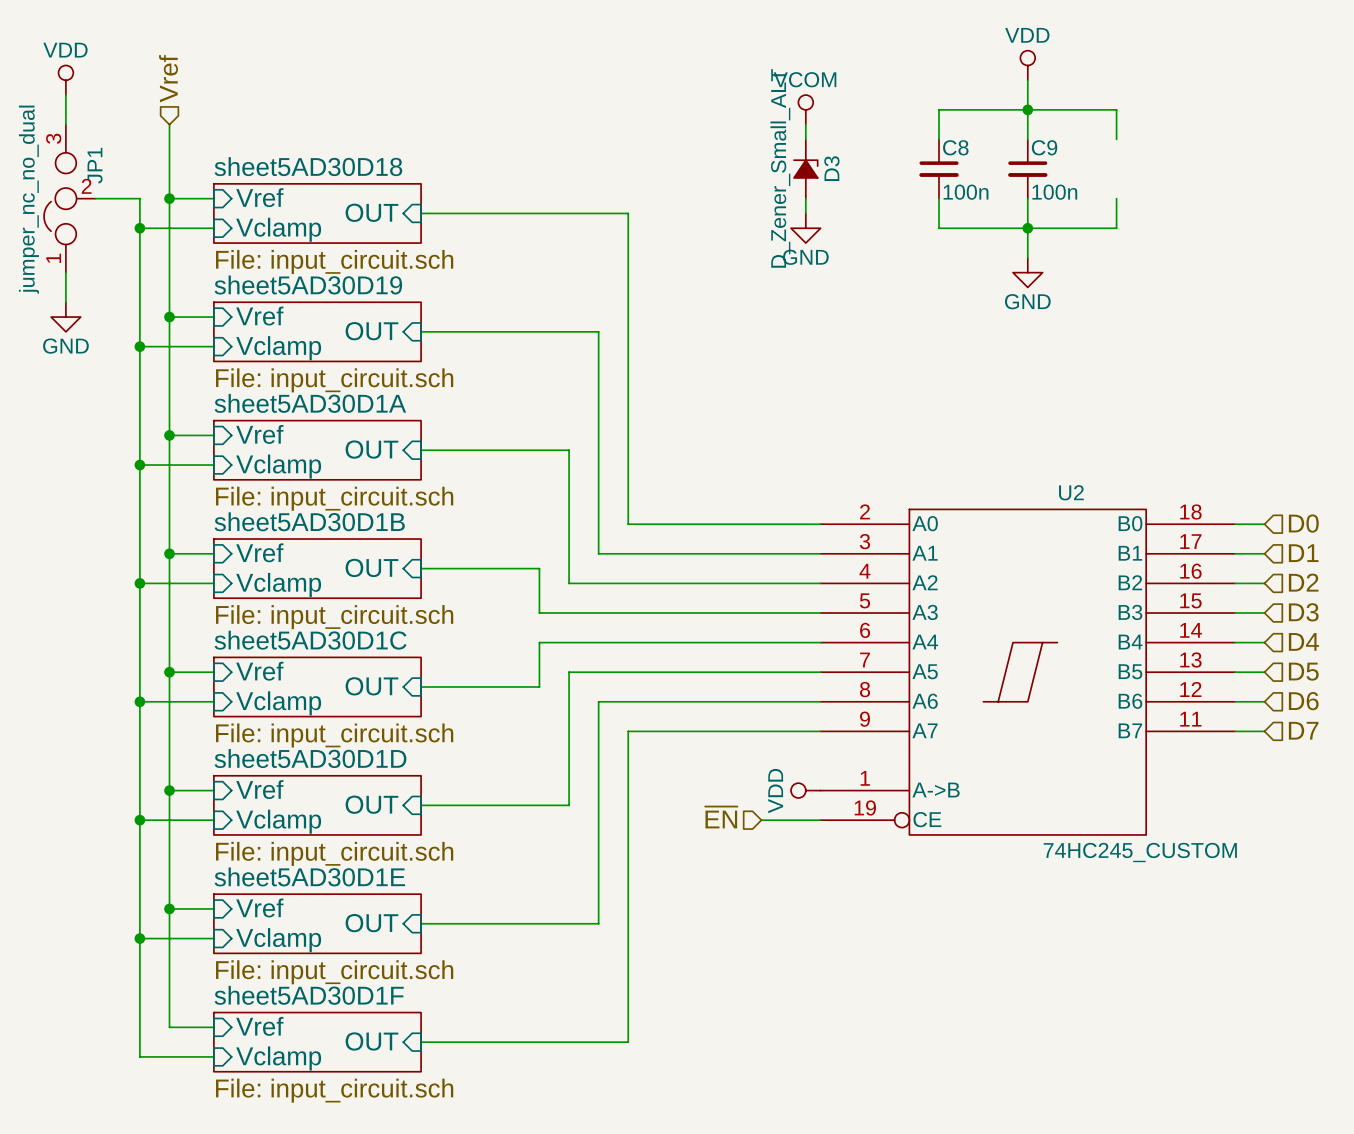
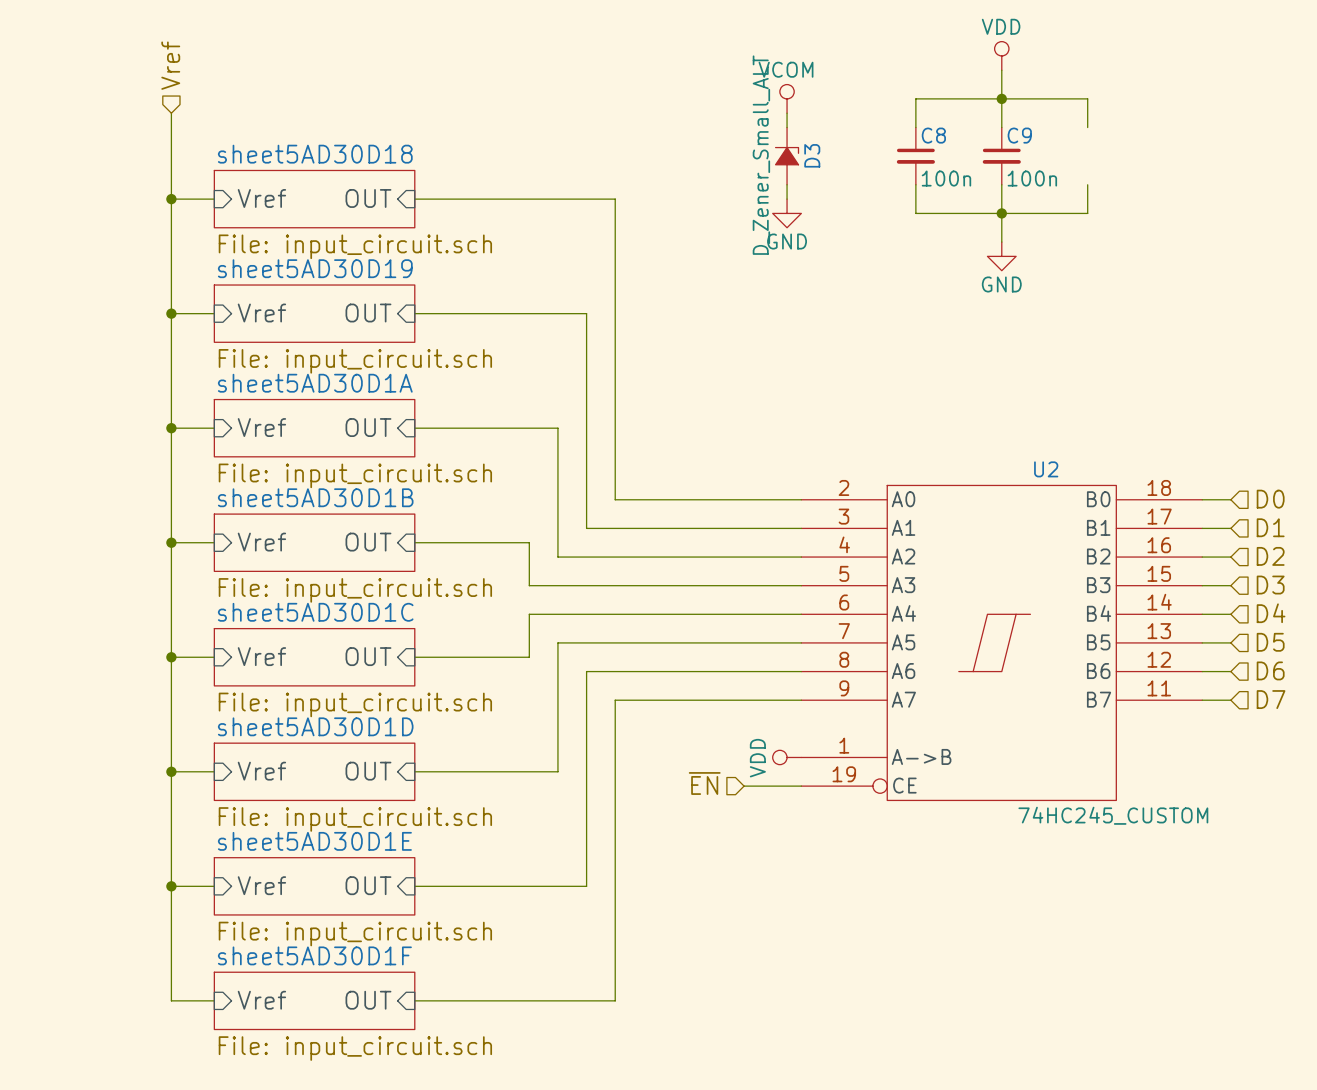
power symbol: VDD (65, 80) -> none
wire: (65, 95) (65, 124) -> none
sheet pin position: Vref (259, 197) -> Vref (261, 198)
JP1: jumper_nc_no_dual (69, 198) -> none
wire: (95, 198) (139, 198) (139, 1056) (213, 1056) -> none
wire: (169, 198) (213, 198) -> (171, 199) (214, 199)
junction position: (169, 198) -> (171, 199)
wire: (139, 228) (213, 228) -> none
junction: (139, 228) -> none
sheet pin: Vclamp (278, 229) -> none
wire: (65, 272) (65, 302) -> none
sheet pin position: Vref (259, 316) -> Vref (261, 313)
power symbol: GND (65, 317) -> none
wire: (169, 317) (213, 317) -> (171, 313) (214, 313)
junction position: (169, 317) -> (171, 313)
wire: (139, 346) (213, 346) -> none
junction: (139, 346) -> none
sheet pin: Vclamp (278, 348) -> none
sheet pin position: Vref (259, 434) -> Vref (261, 427)
wire: (169, 435) (213, 435) -> (171, 428) (214, 428)
junction position: (169, 435) -> (171, 428)
wire: (139, 465) (213, 465) -> none
junction: (139, 465) -> none
sheet pin: Vclamp (278, 466) -> none
sheet pin position: Vref (259, 552) -> Vref (261, 542)
wire: (169, 553) (213, 553) -> (171, 542) (214, 542)
junction position: (169, 553) -> (171, 542)
wire: (139, 583) (213, 583) -> none
junction: (139, 583) -> none
sheet pin: Vclamp (278, 584) -> none
sheet pin position: Vref (259, 671) -> Vref (261, 656)
wire: (169, 672) (213, 672) -> (171, 657) (214, 657)
junction position: (169, 672) -> (171, 657)
wire: (139, 701) (213, 701) -> none
junction: (139, 701) -> none
sheet pin: Vclamp (278, 703) -> none
sheet pin position: Vref (259, 789) -> Vref (261, 771)
wire: (169, 790) (213, 790) -> (171, 771) (214, 771)
junction position: (169, 790) -> (171, 771)
wire: (139, 820) (213, 820) -> none
junction: (139, 820) -> none
sheet pin: Vclamp (278, 821) -> none
sheet pin position: Vref (259, 907) -> Vref (261, 885)
wire: (169, 908) (213, 908) -> (171, 886) (214, 886)
junction position: (169, 908) -> (171, 886)
wire: (139, 938) (213, 938) -> none
junction: (139, 938) -> none
sheet pin: Vclamp (278, 940) -> none
sheet pin position: Vref (259, 1026) -> Vref (261, 1000)
wire: (169, 1027) (213, 1027) -> (171, 986) (171, 1000) (214, 1000)
sheet pin: Vclamp (278, 1058) -> none

